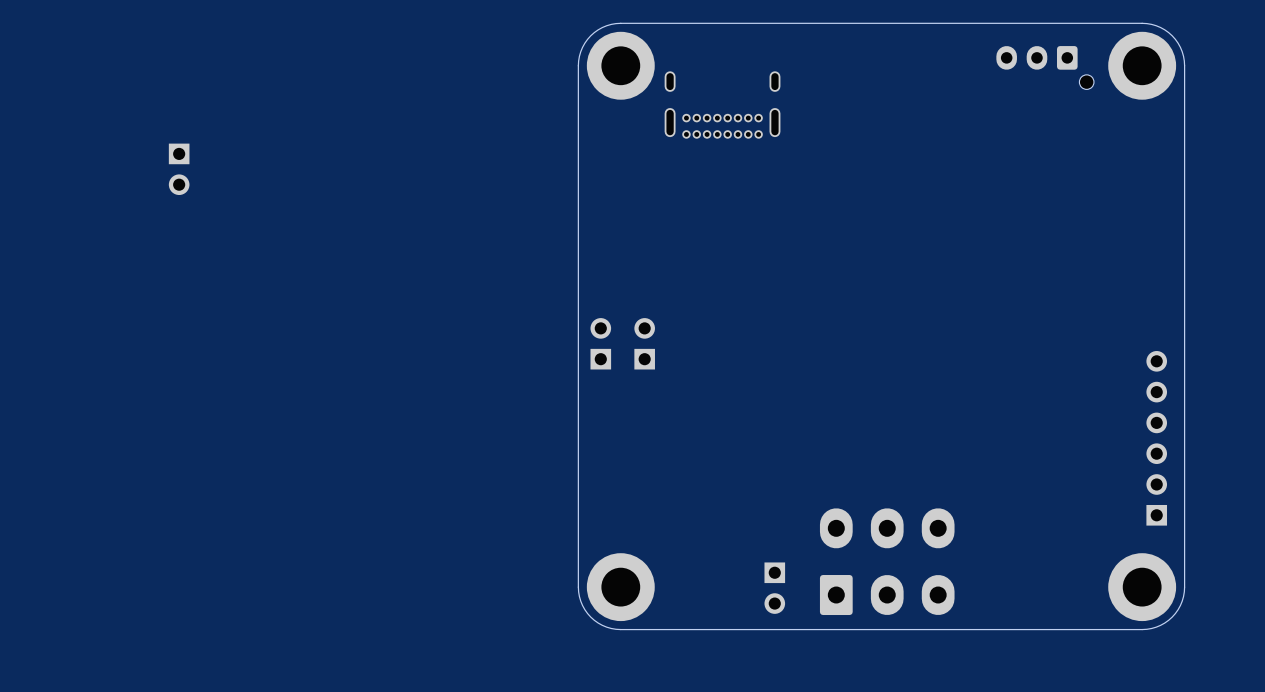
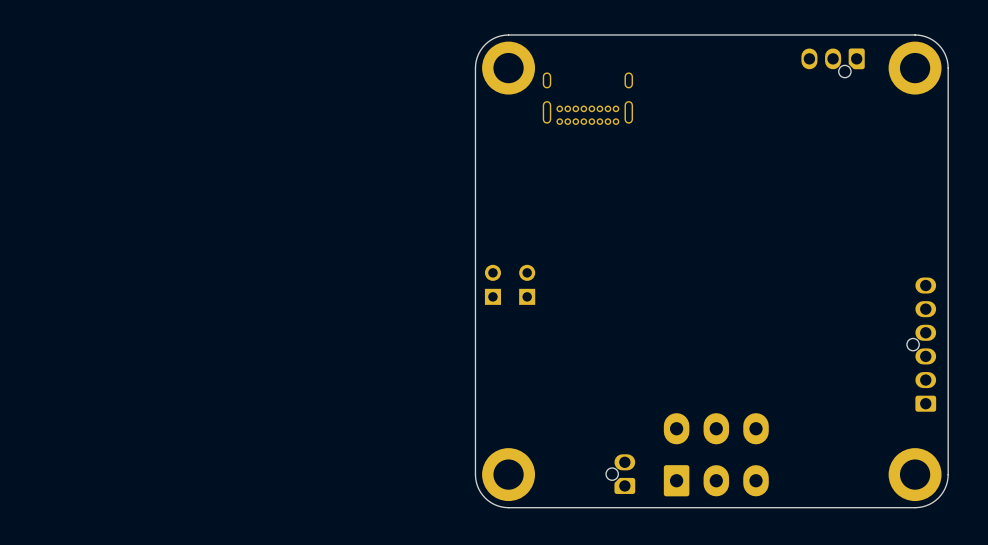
part footprint: [996, 46, 1094, 90] -> [801, 48, 865, 78]
part: (179, 169) -> none
part: none -> (921, 344)
part: (1156, 438) -> none
part footprint: [764, 562, 786, 614] -> [606, 454, 636, 494]

